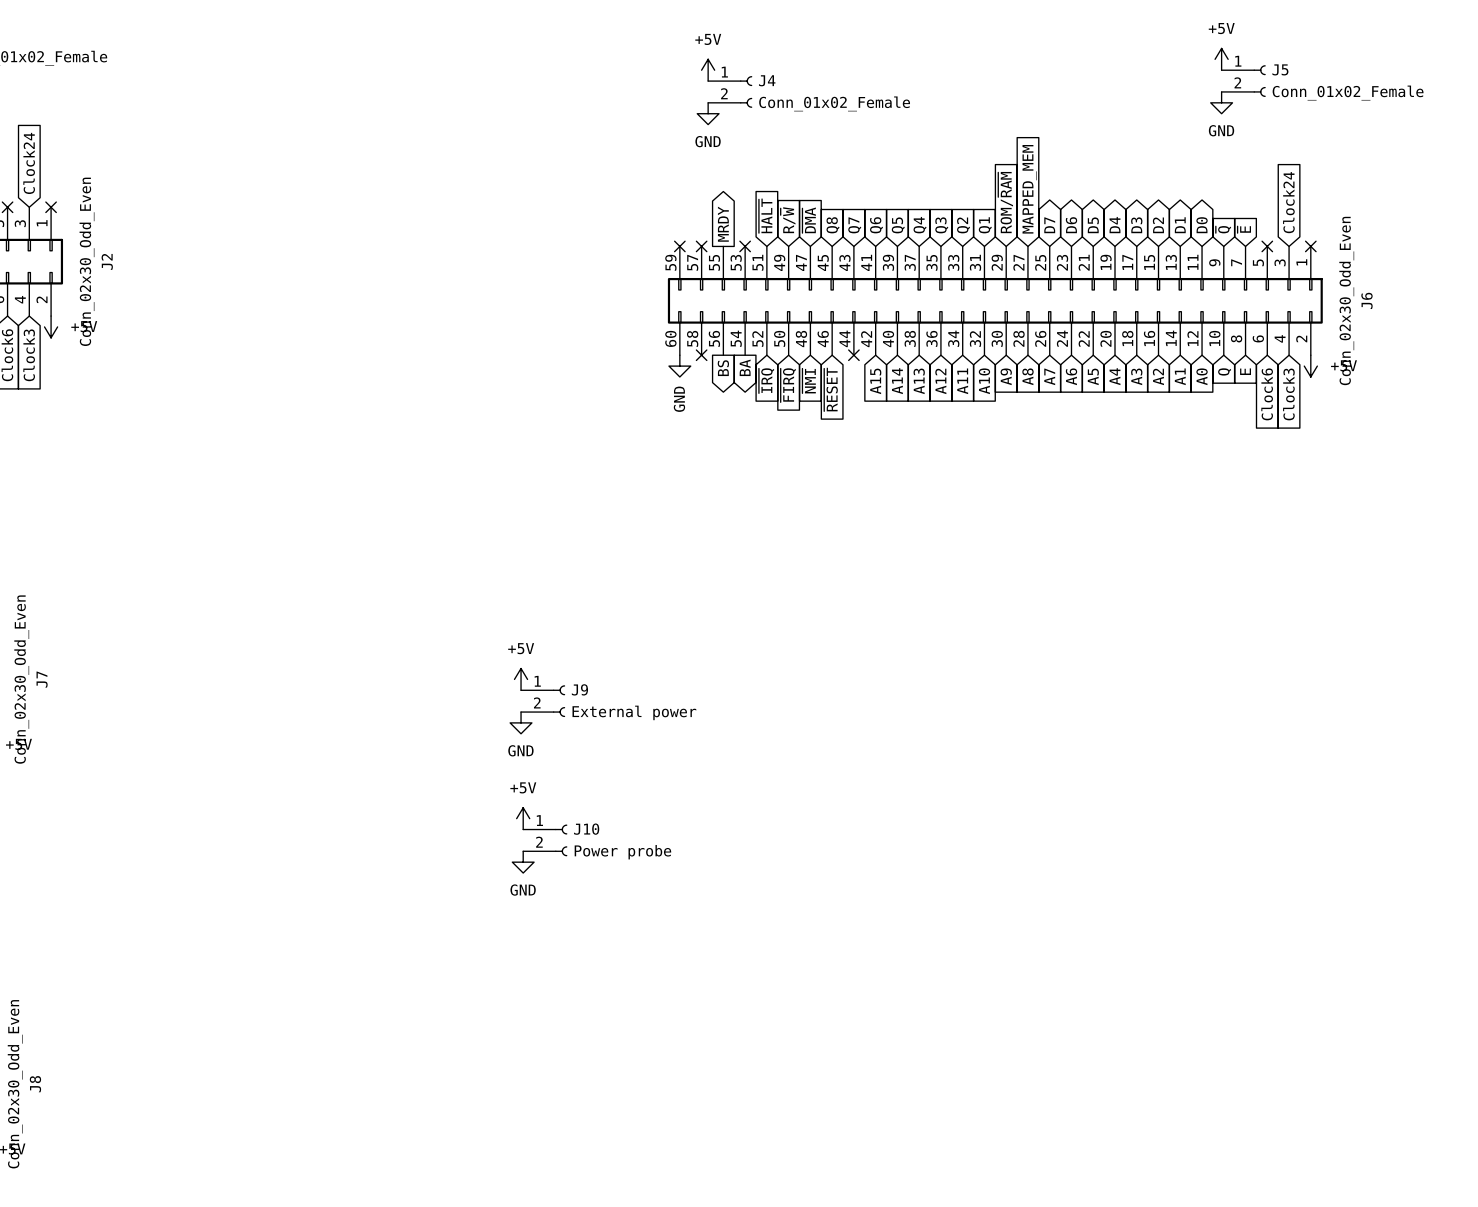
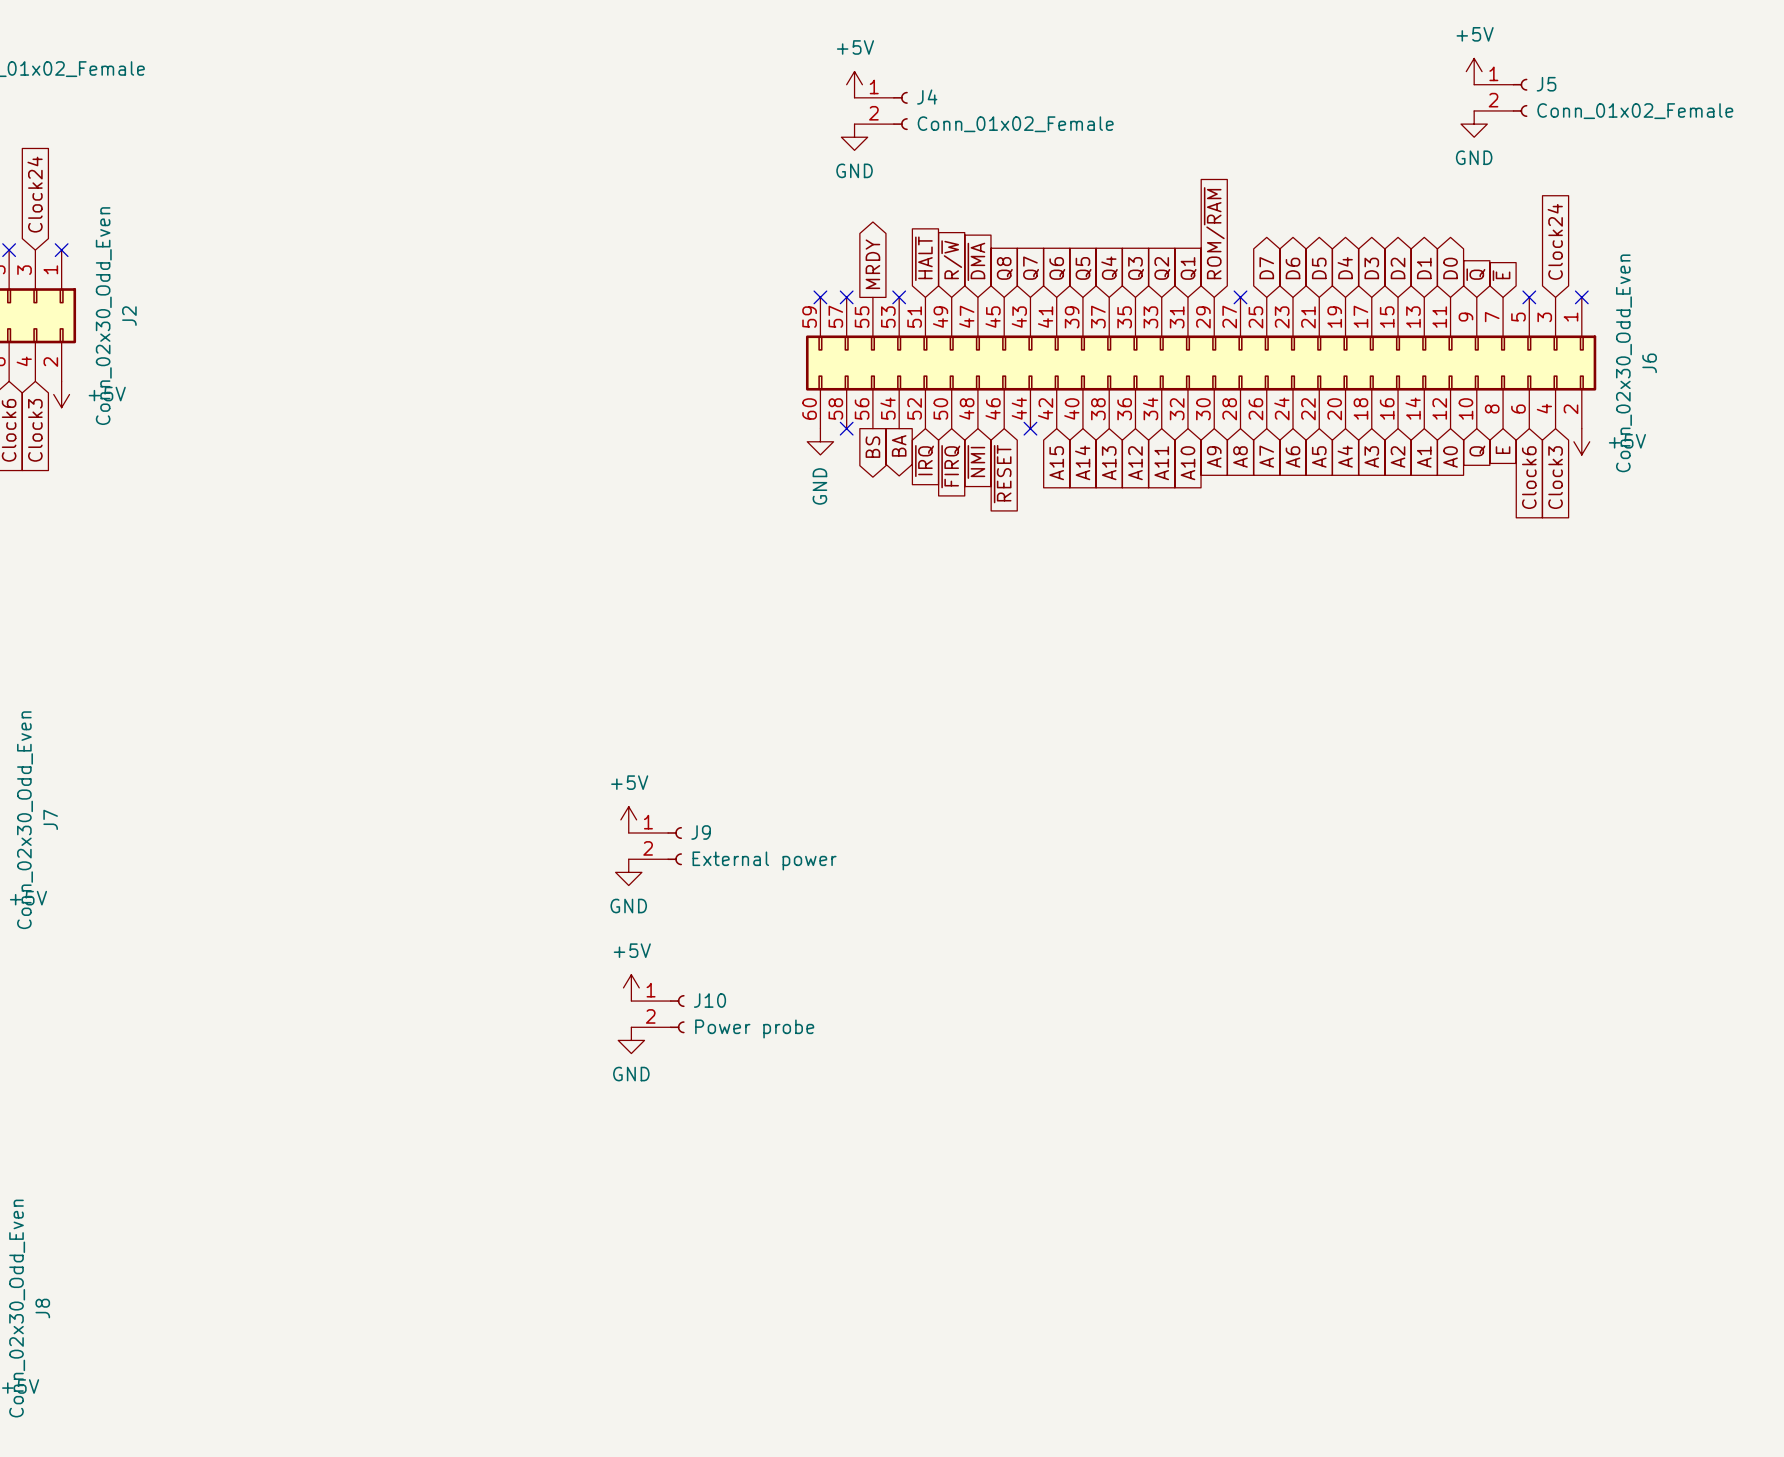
global label: MAPPED_MEM (1029, 189) -> none
no-connect mark: none -> (1240, 297)

